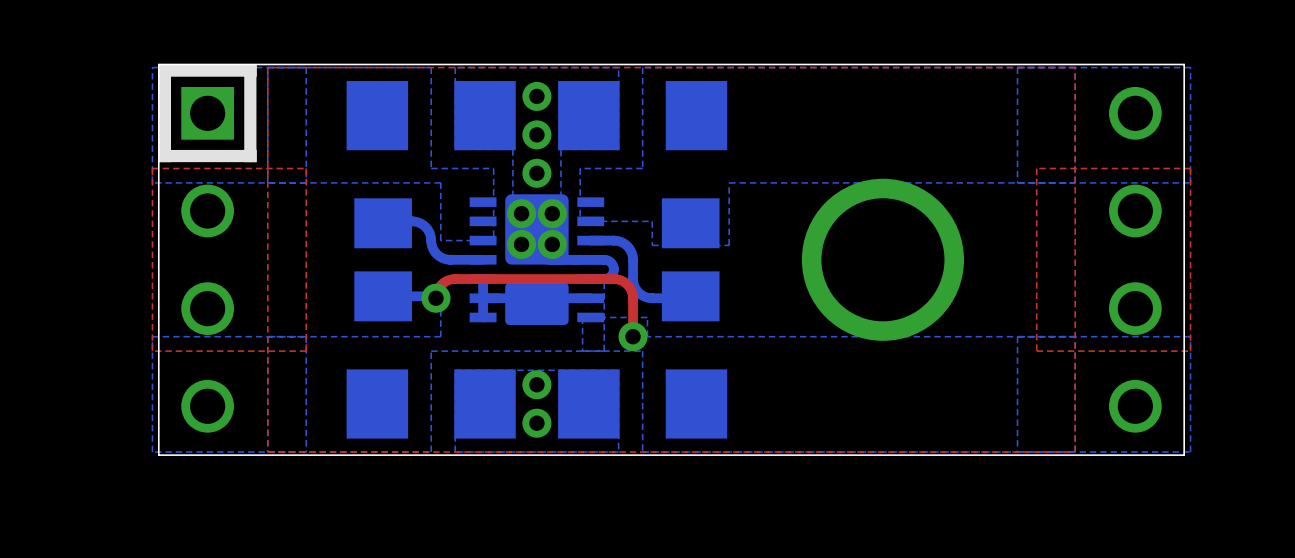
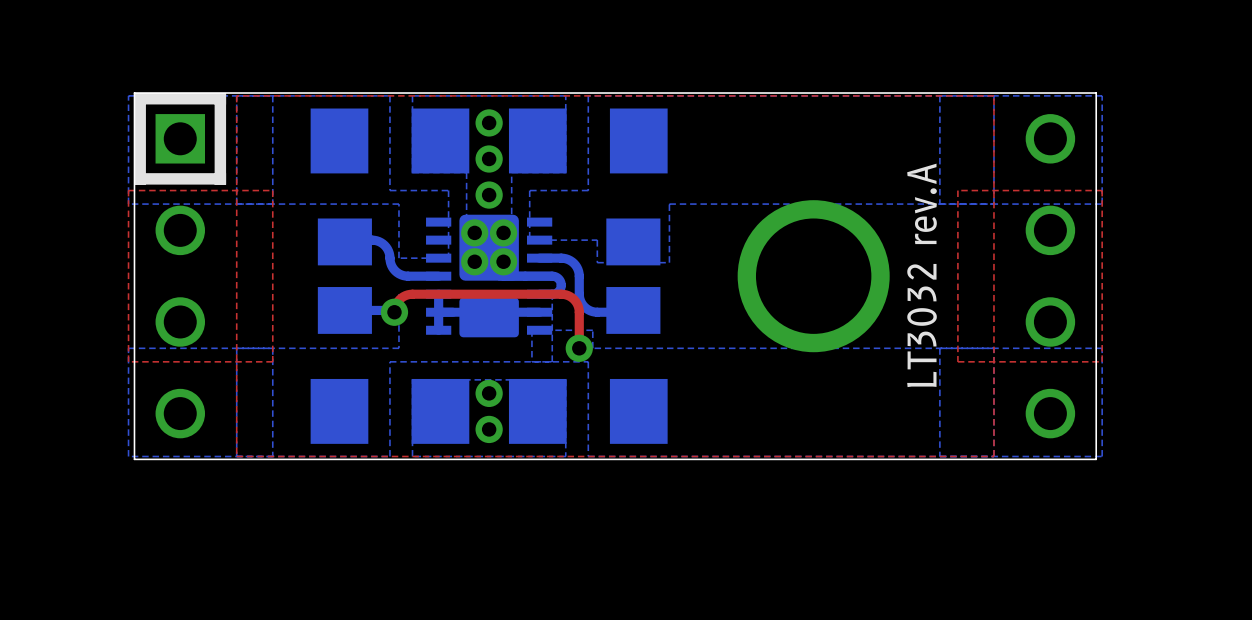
drawing: none -> [907, 163, 937, 388]

